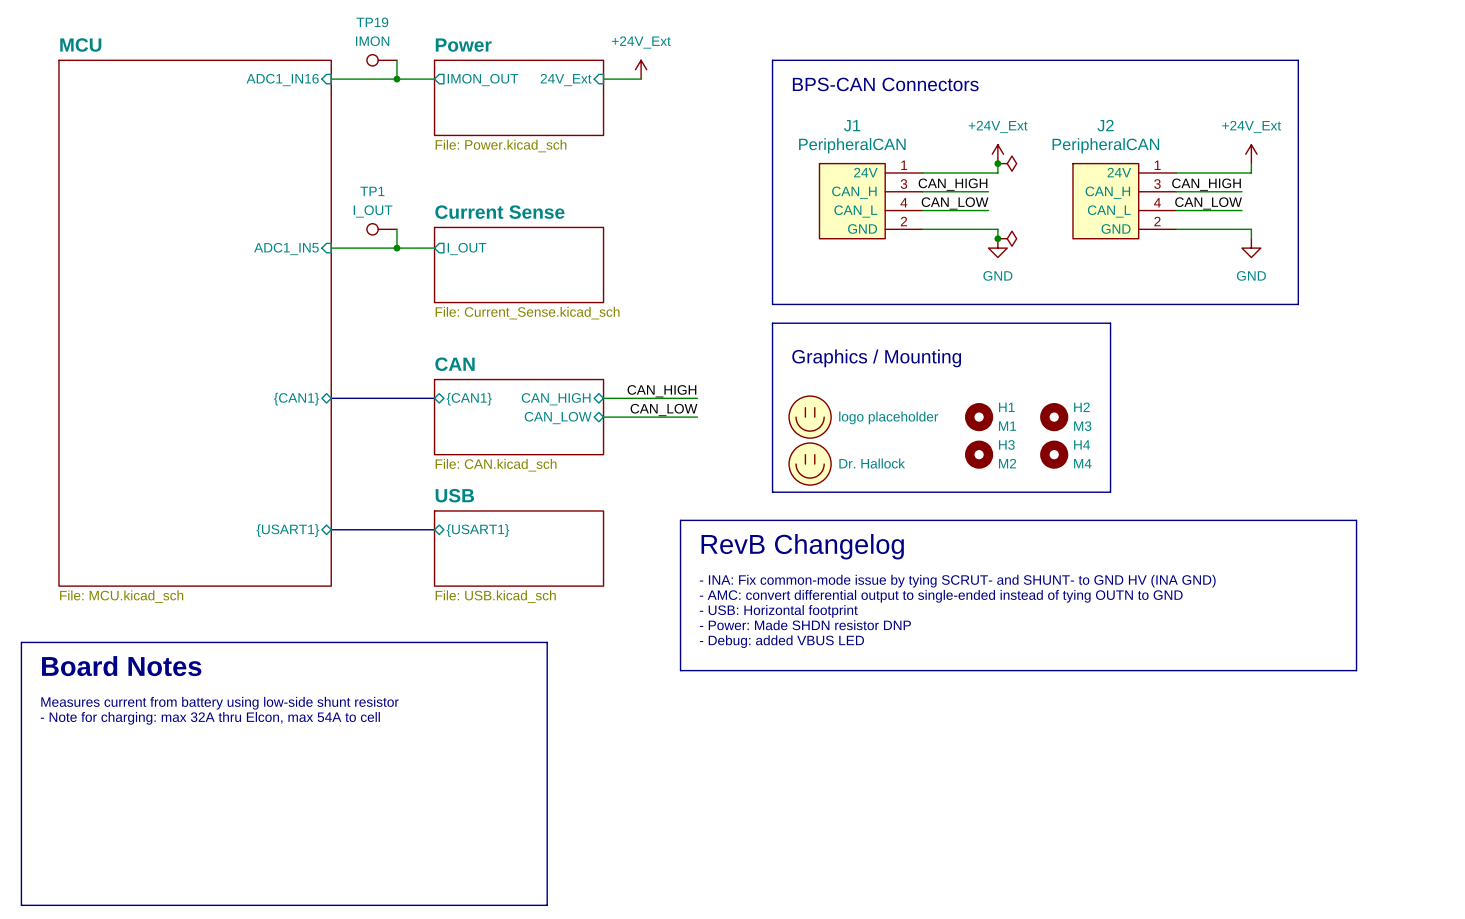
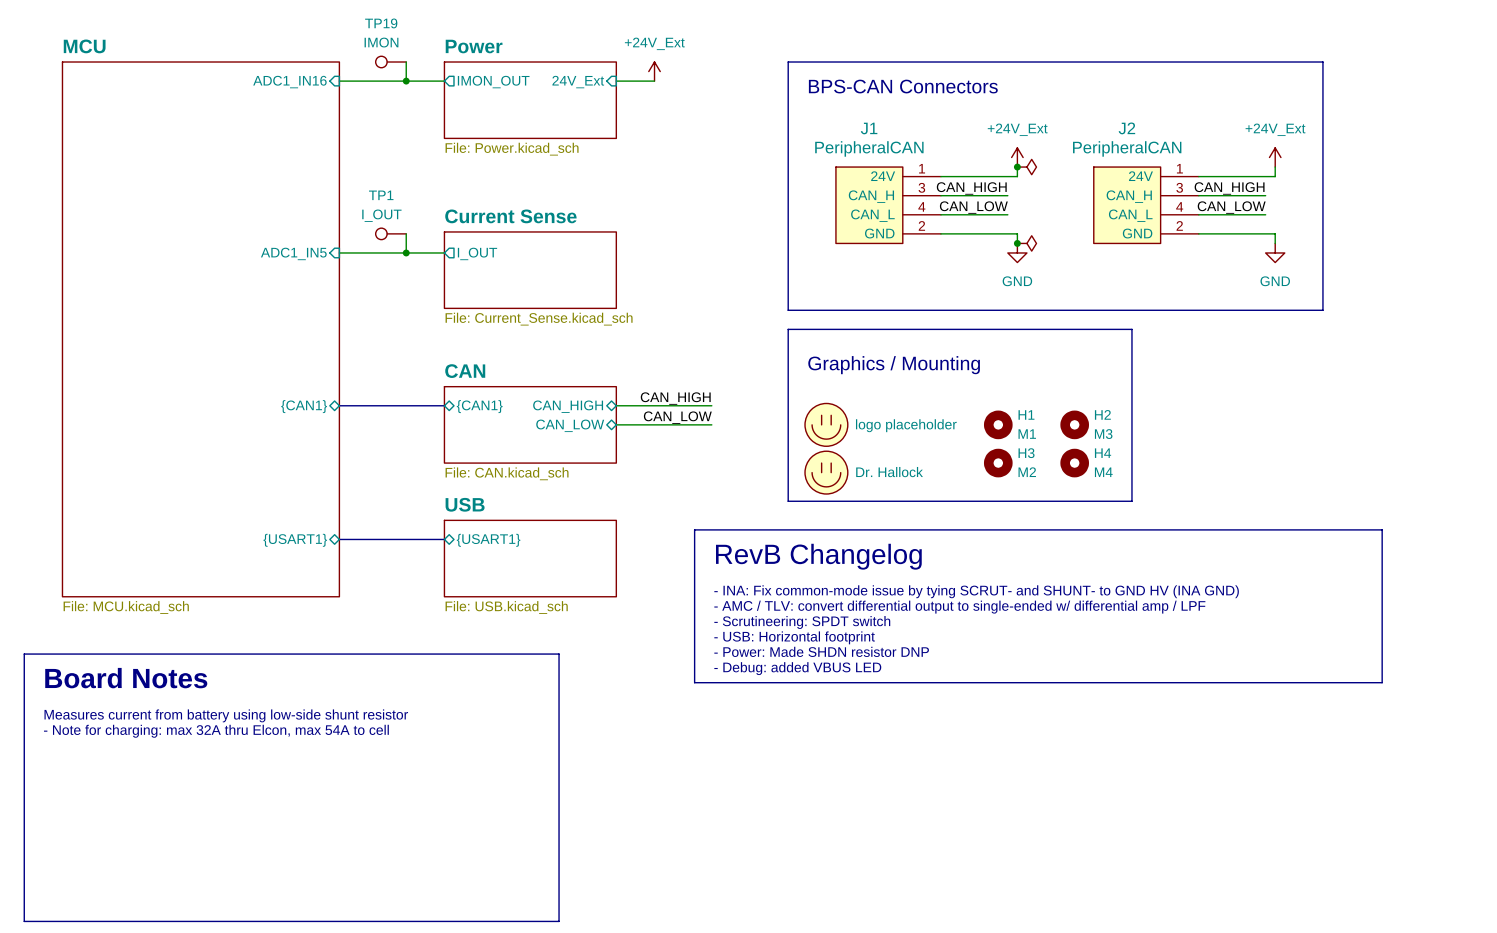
text: - AMC: convert differential output to single-ended instead of tying OUTN to GND (941, 596) -> - AMC / TLV: convert differential output to single-ended w/ differential amp / LPF (959, 607)
text: - USB: Horizontal footprint (778, 611) -> - Scrutineering: SPDT switch (802, 622)
text: - Power: Made SHDN resistor DNP (805, 625) -> - USB: Horizontal footprint (794, 637)
text: - Debug: added VBUS LED (781, 641) -> - Power: Made SHDN resistor DNP (821, 651)
text: none -> - Debug: added VBUS LED (797, 668)

